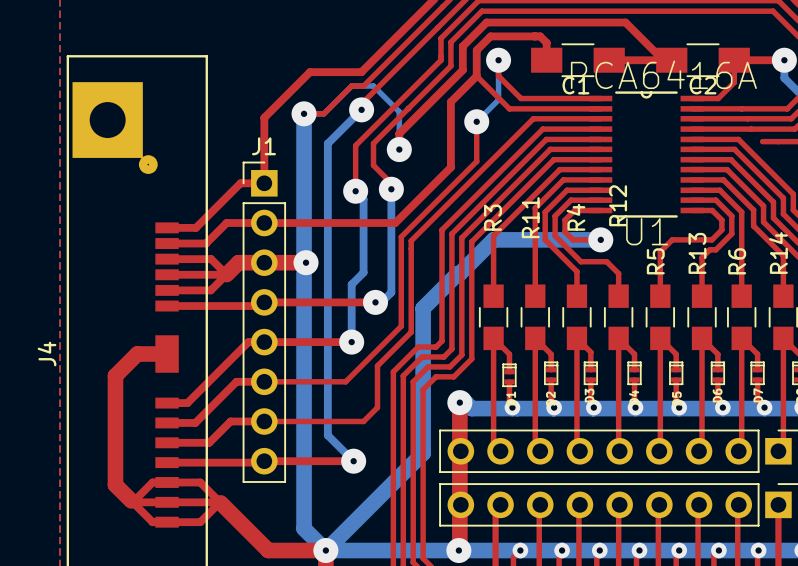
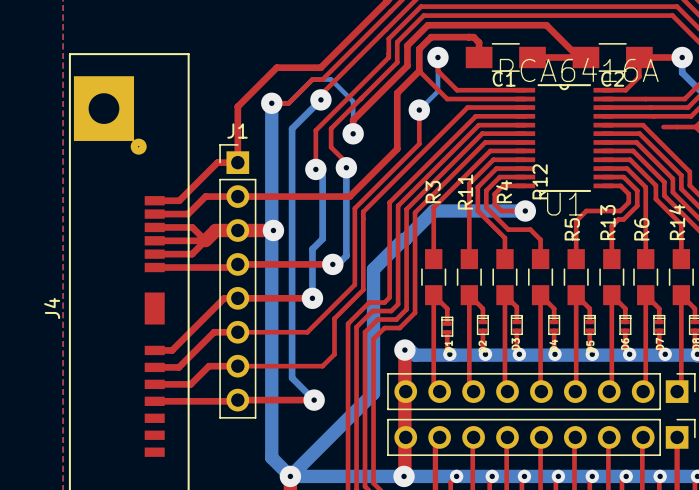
top track: (167, 354) (137, 354) (115, 375) (115, 485) (152, 522) (200, 522) (220, 502) (132, 502) (152, 482) (200, 482) (220, 502) (268, 550) (325, 550) -> none

